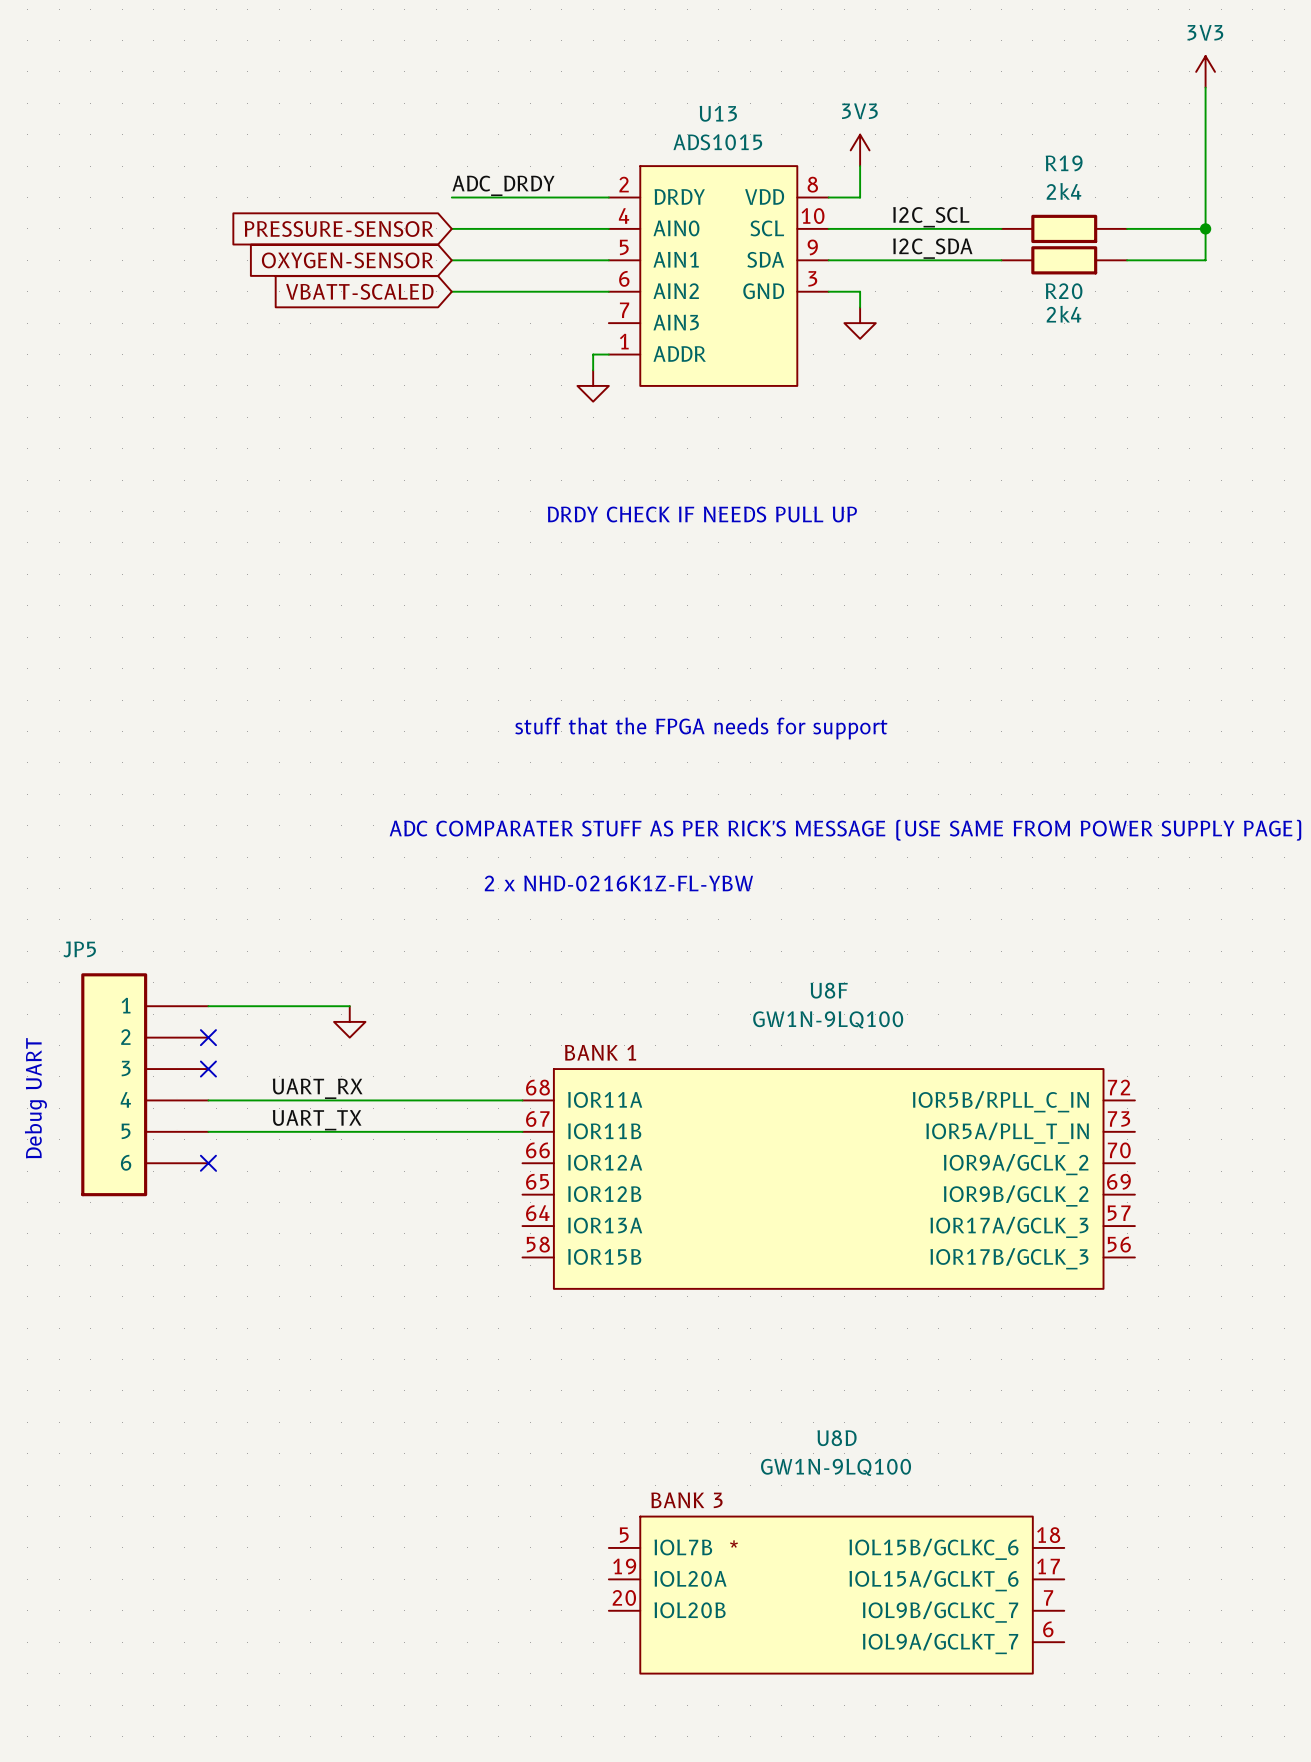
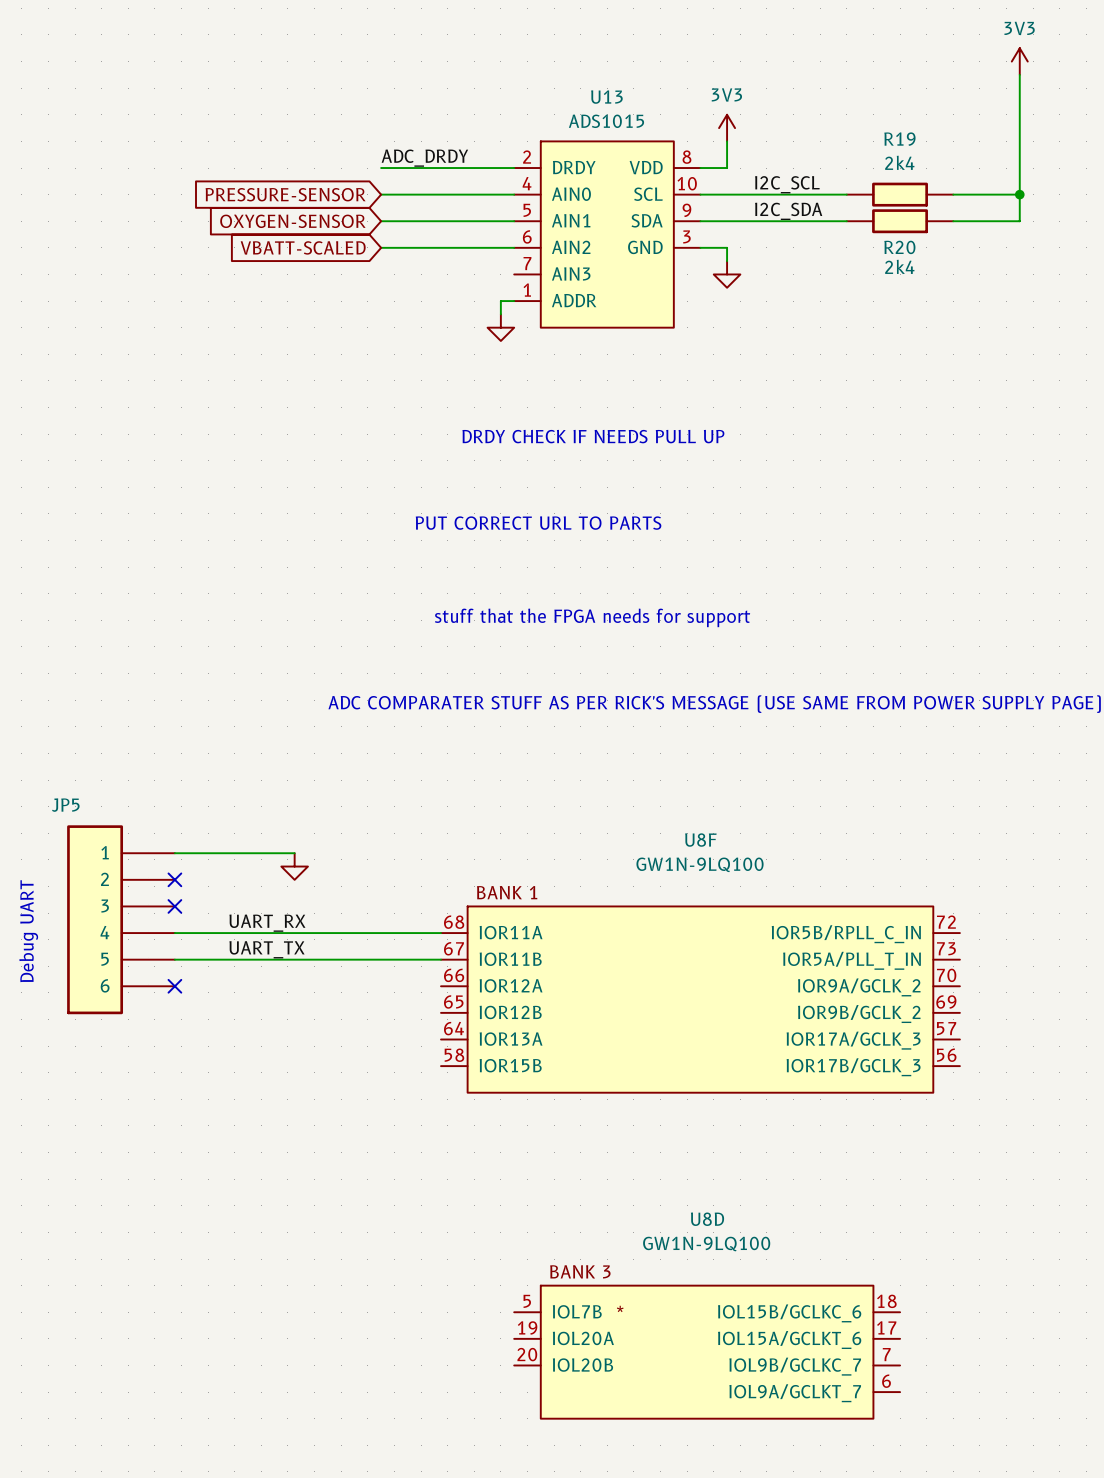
text: none -> PUT CORRECT URL TO PARTS (538, 523)
text: 2 x NHD-0216K1Z-FL-YBW (618, 883) -> none

